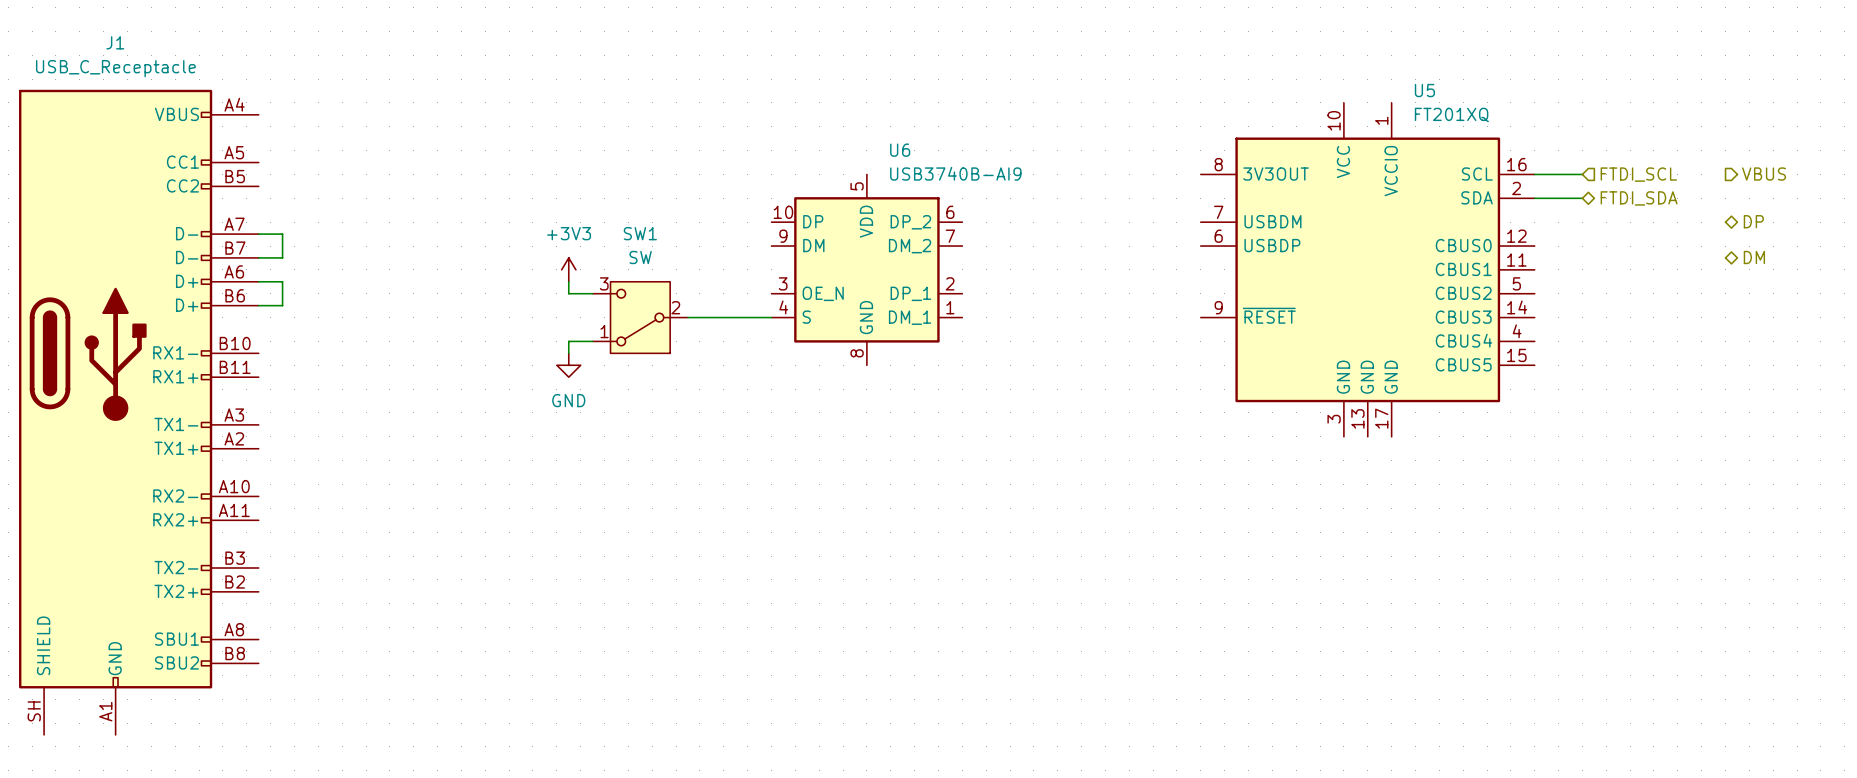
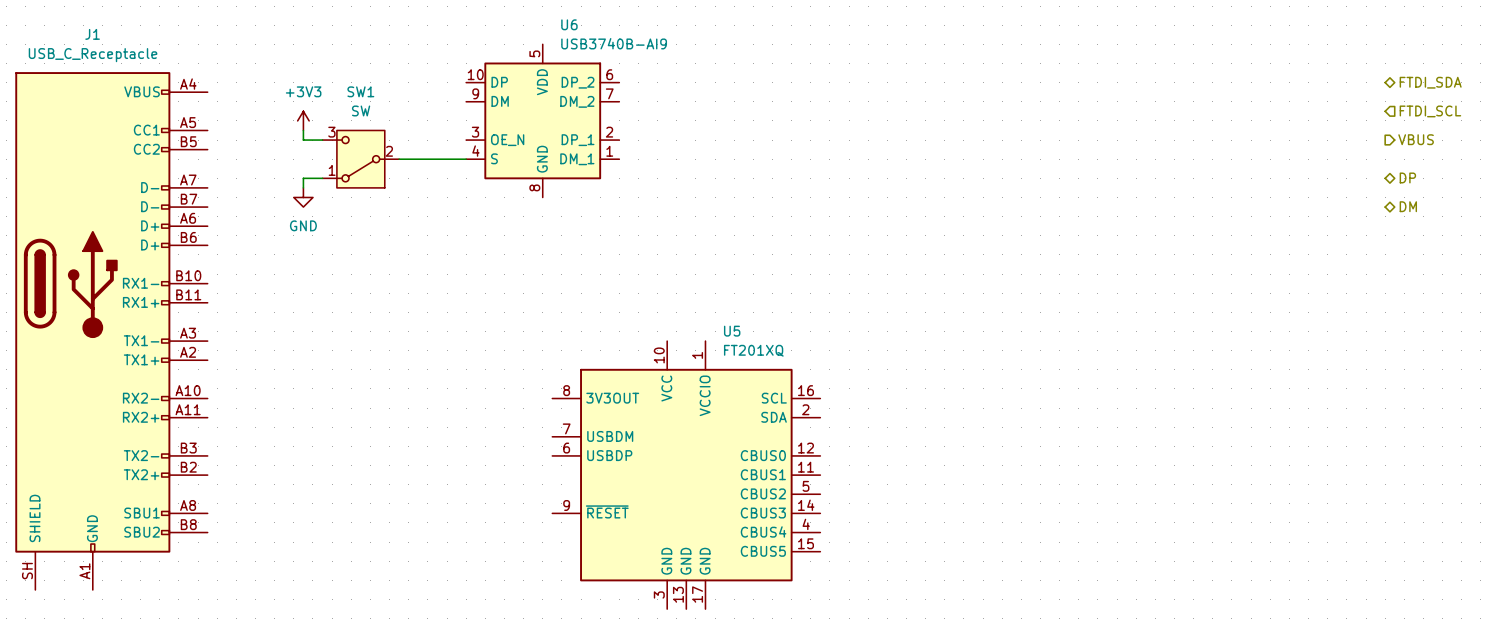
wire: (1534, 174) (1582, 174) -> none
hierarchical label position: FTDI_SCL (1638, 174) -> FTDI_SCL (1430, 111)
wire: (1534, 198) (1582, 198) -> none
hierarchical label position: FTDI_SDA (1639, 198) -> FTDI_SDA (1430, 82)
wire: (258, 234) (282, 234) (282, 257) (258, 257) -> none
power symbol position: +3V3 (568, 269) -> +3V3 (303, 120)
U6 position: (866, 269) -> (542, 120)
U5 position: (1367, 269) -> (686, 475)
wire: (258, 281) (282, 281) (282, 305) (258, 305) -> none
wire: (568, 281) (568, 293) (592, 293) -> (303, 130) (303, 140) (322, 140)
SW1 position: (640, 317) -> (360, 159)
wire: (688, 317) (771, 317) -> (399, 159) (466, 159)
wire: (592, 341) (568, 341) (568, 353) -> (322, 178) (303, 178) (303, 187)
power symbol position: GND (568, 365) -> GND (303, 197)

